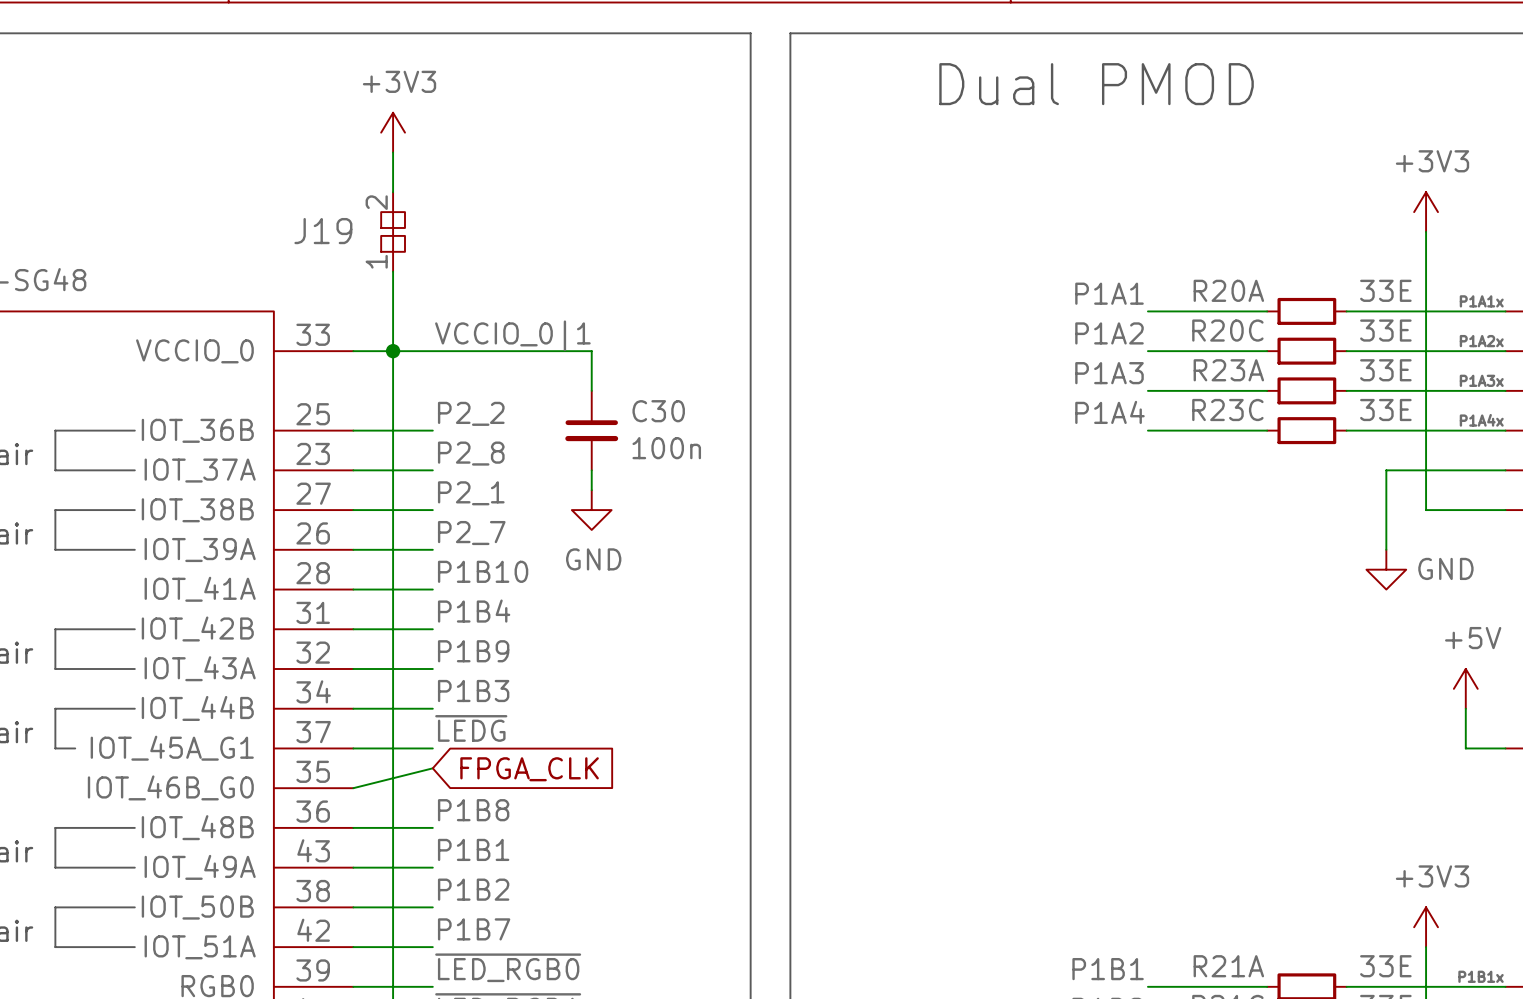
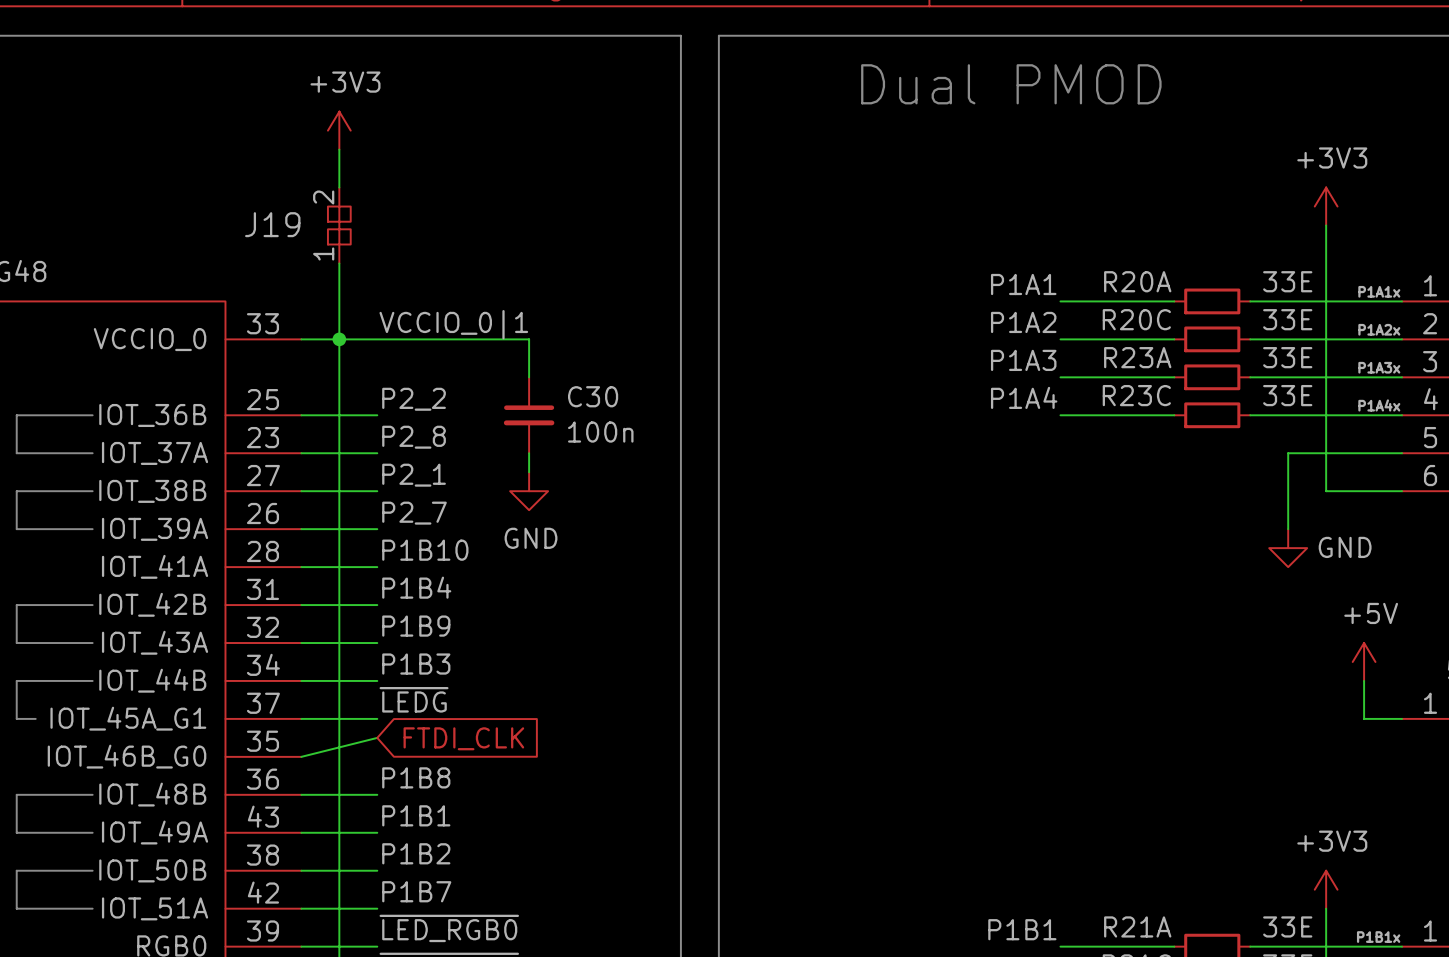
global label: FPGA_CLK (529, 769) -> FTDI_CLK (463, 738)

